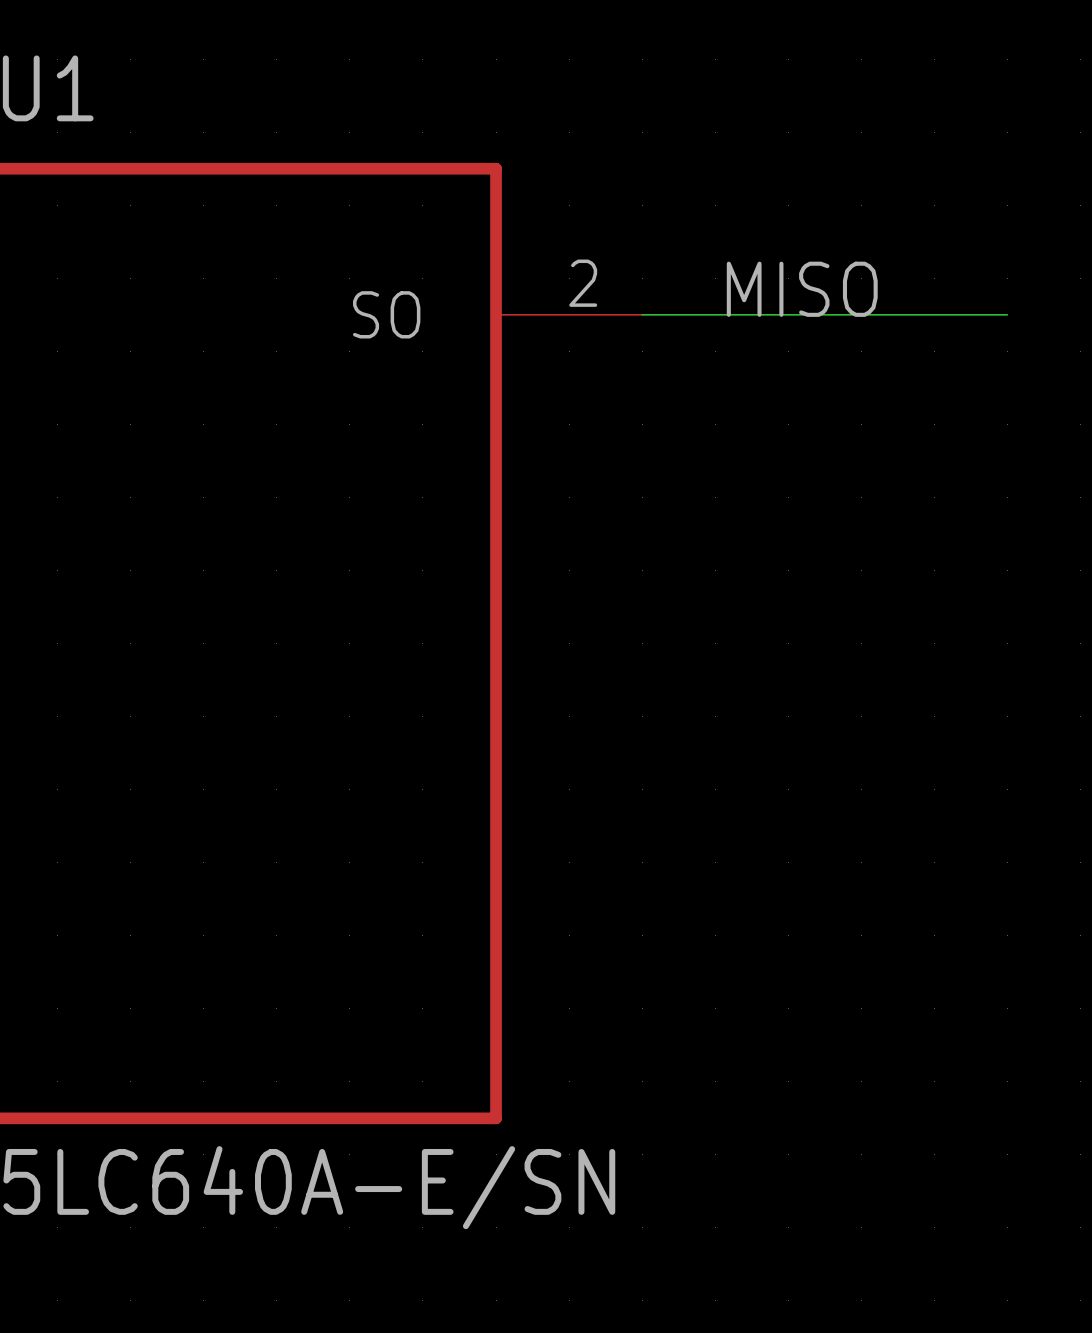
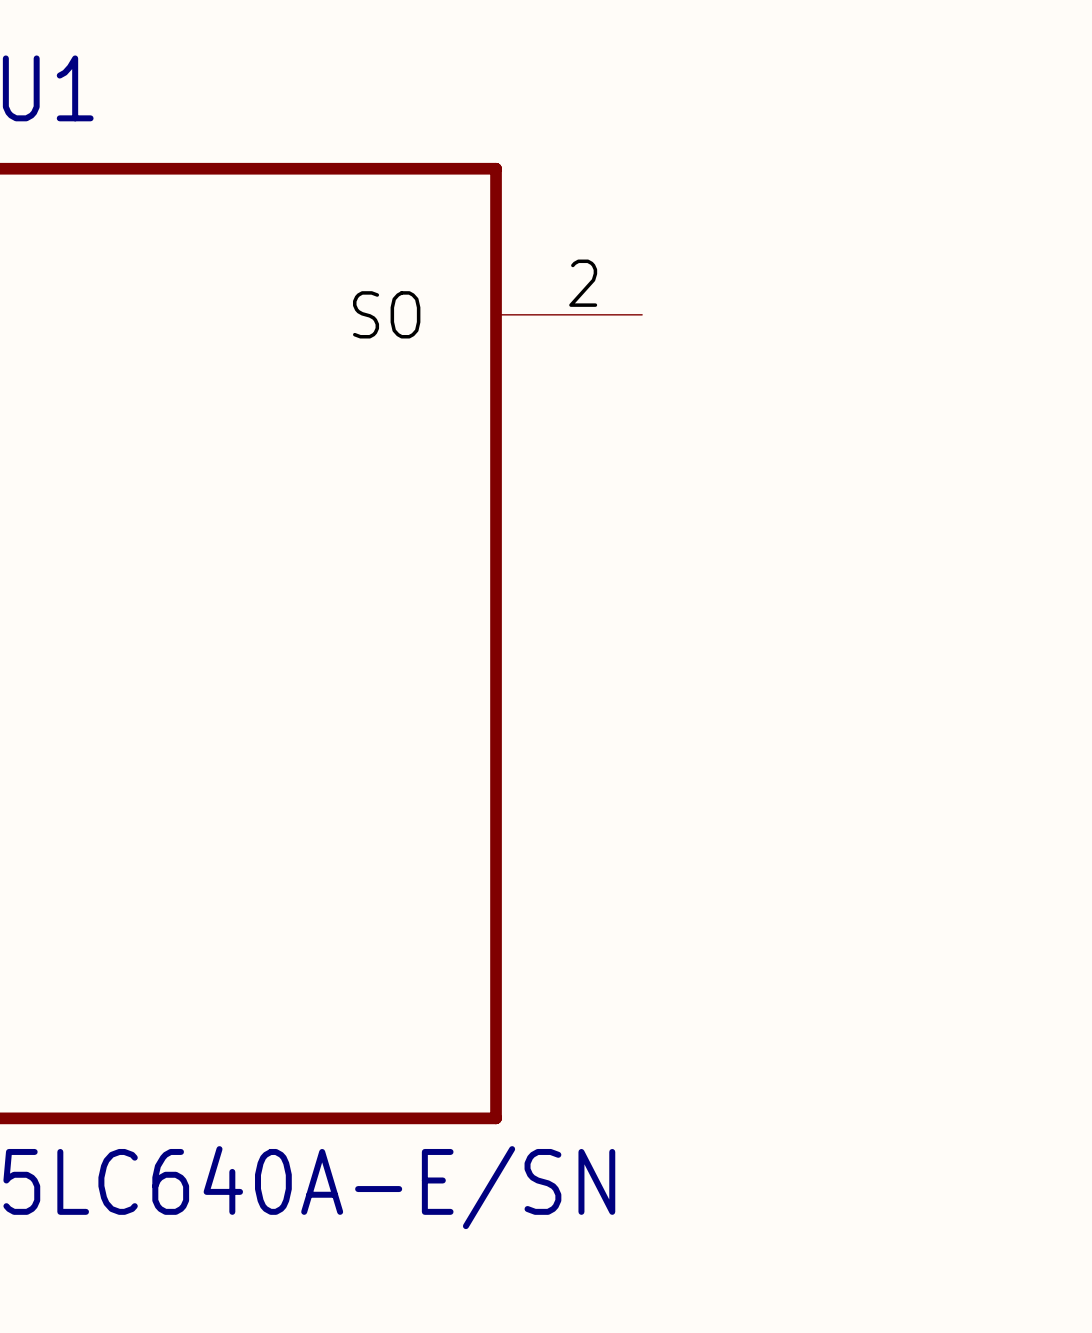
label: MISO (802, 289) -> none
wire: (642, 314) (1007, 314) -> none

